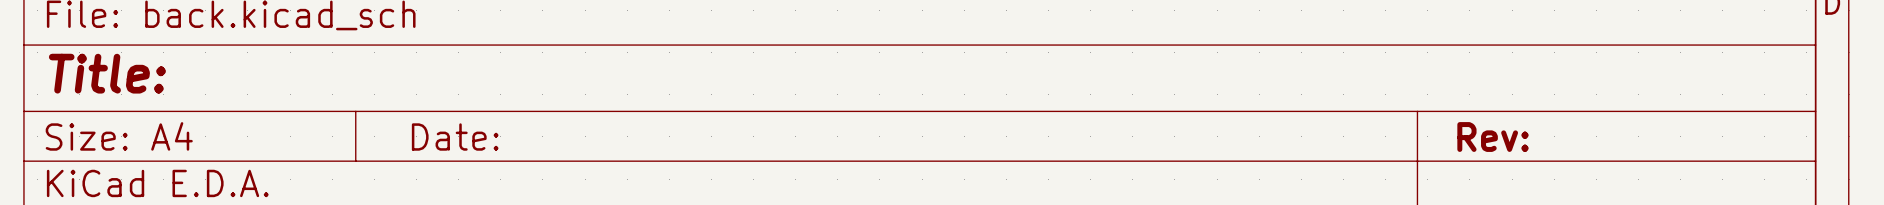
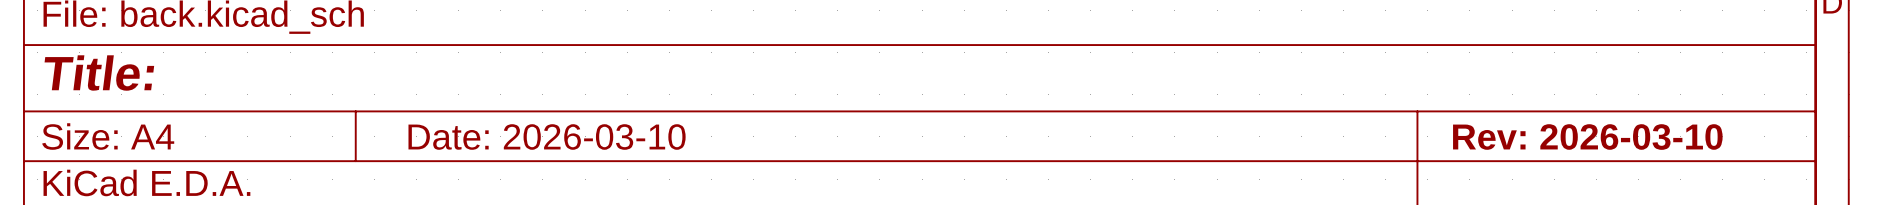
title block: Date: (455, 137) -> Date: 2026-03-10 (547, 137)
title block: Rev: (1493, 137) -> Rev: 2026-03-10 (1587, 137)

